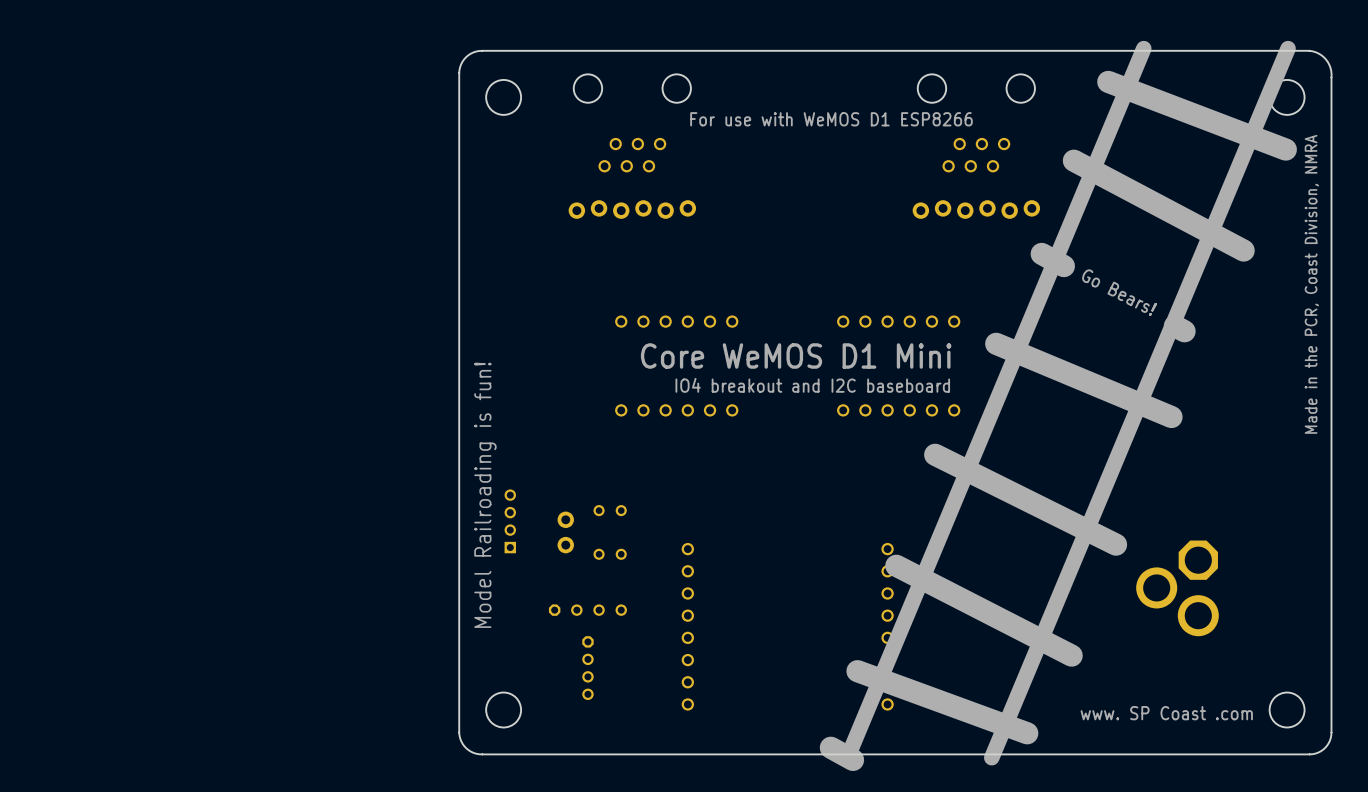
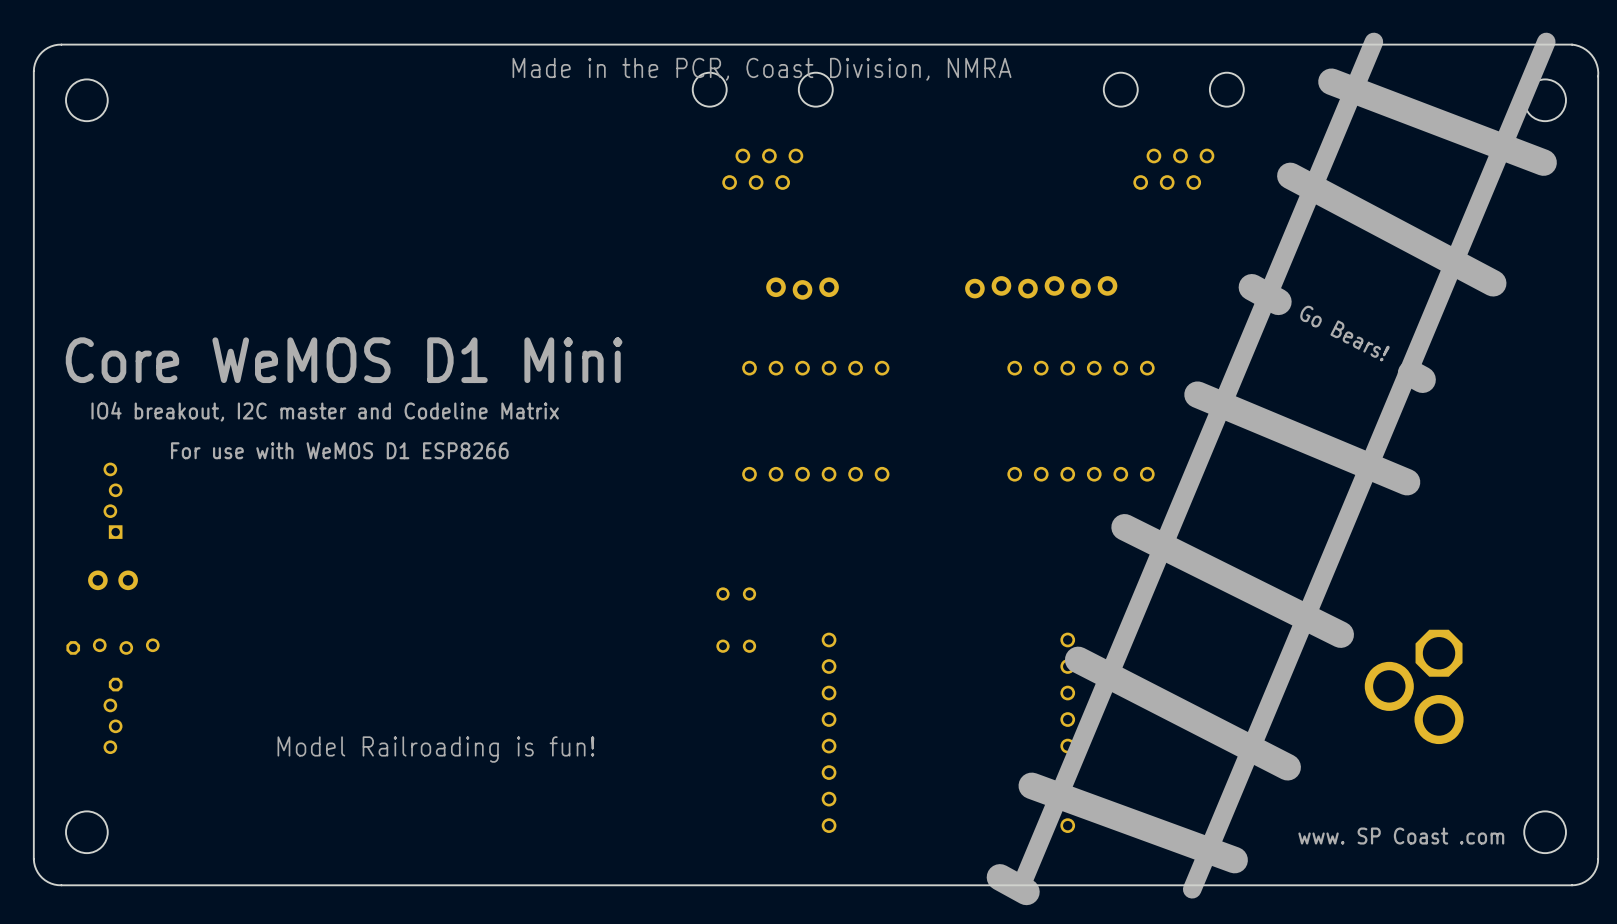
text: none -> Made in the PCR, Coast Division, NMRA (762, 69)
text: For use with WeMOS D1 ESP8266 (831, 119) -> none
part: (632, 209) -> none
part: (976, 209) -> none
part: none -> (1041, 287)
part: none -> (802, 288)
text: Made in the PCR, Coast Division, NMRA (1311, 284) -> none
text: none -> Core WeMOS D1 Mini (344, 360)
text: Core WeMOS D1 Mini (796, 356) -> none
text: none -> IO4 breakout, I2C master and Codeline Matrix (325, 411)
text: IO4 breakout and I2C baseboard (812, 385) -> none
text: none -> For use with WeMOS D1 ESP8266 (339, 450)
part: none -> (816, 464)
part: (895, 402) -> none
part: none -> (113, 500)
text: Model Railroading is fun! (485, 495) -> none
part: none -> (113, 580)
part: (510, 521) -> none
part: (565, 532) -> none
part: none -> (113, 696)
text: none -> Model Railroading is fun! (435, 749)
part: (587, 652) -> none

